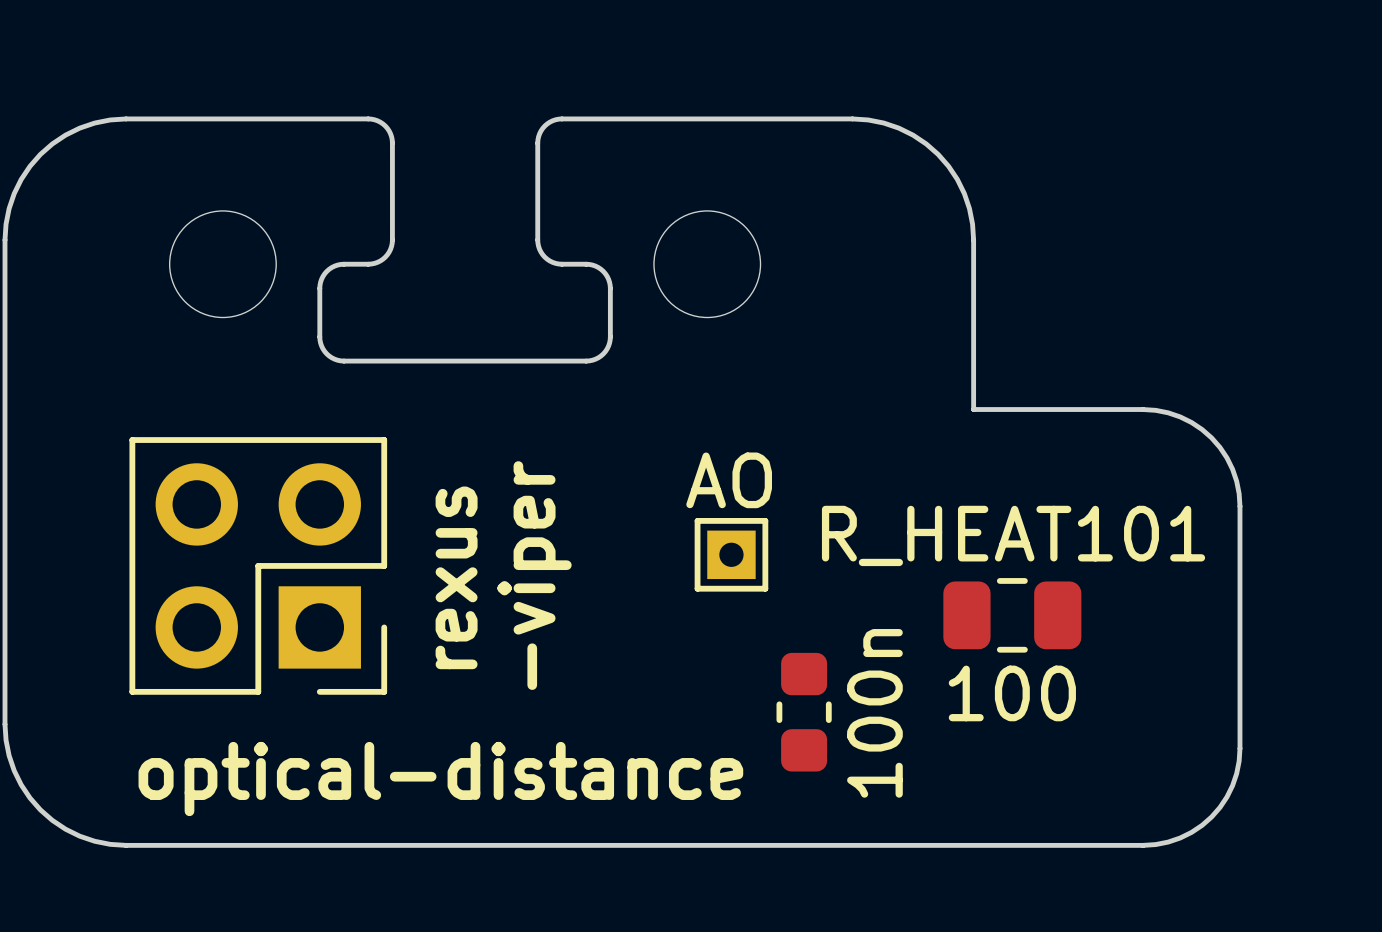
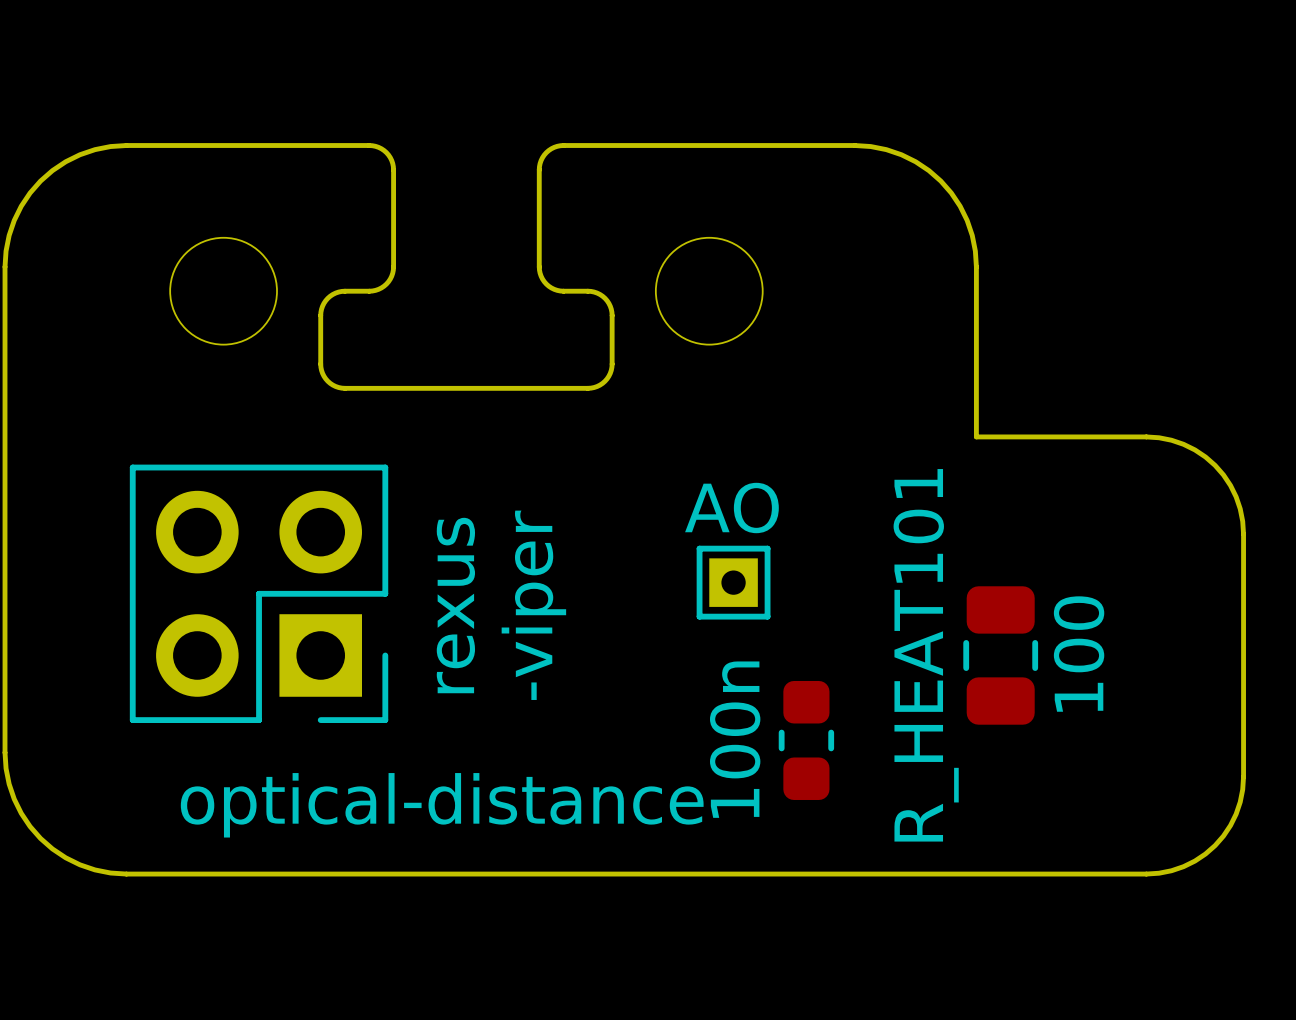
R_HEAT101 name position: R_HEAT101 (1013, 535) -> R_HEAT101 (926, 655)
R_HEAT101 rotation: 0° (1012, 615) -> 90° clockwise (1000, 655)
R_HEAT101 value position: 100 (1012, 693) -> 100 (1079, 654)
part value position: 100n (874, 713) -> 100n (735, 739)

